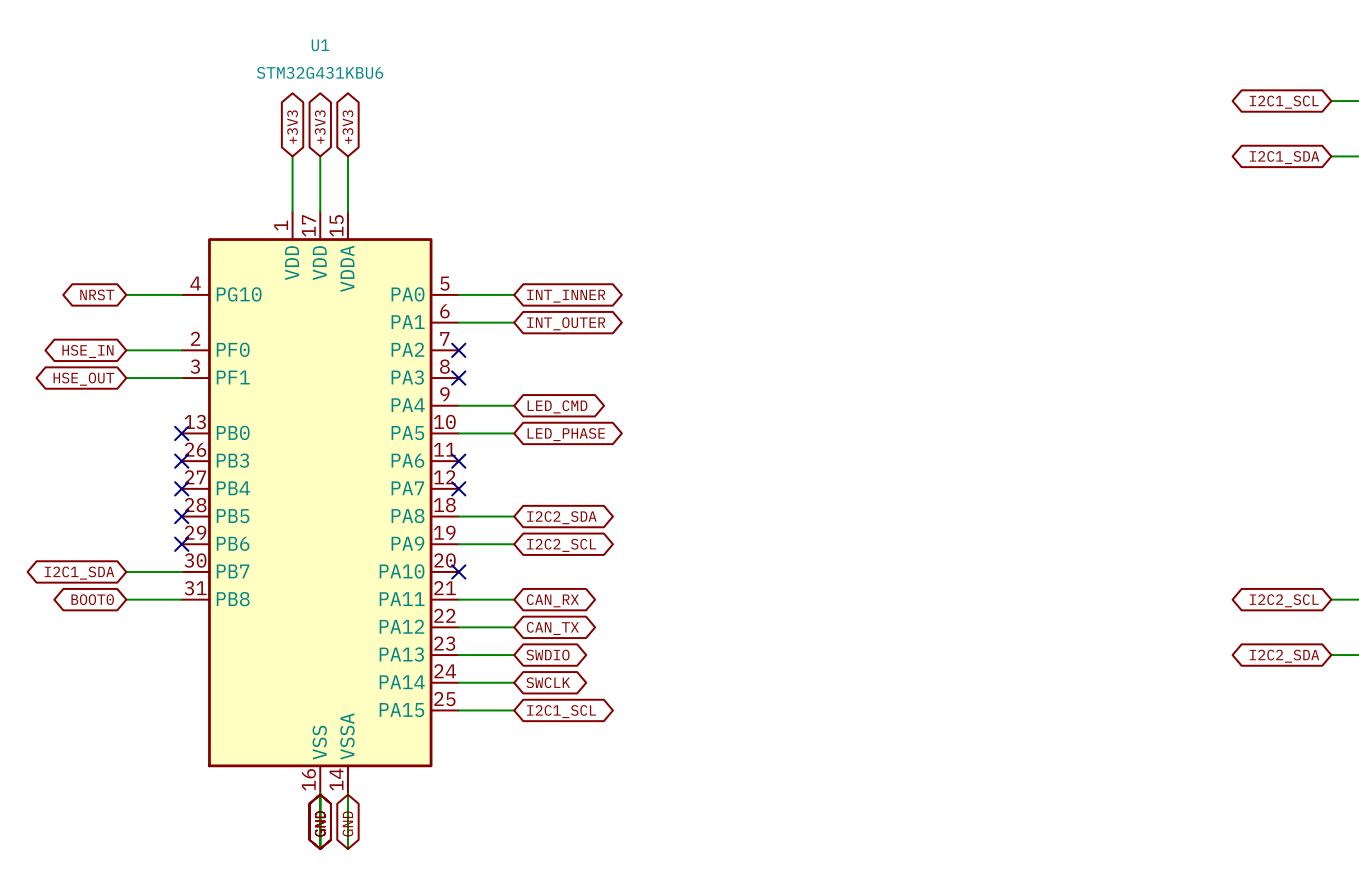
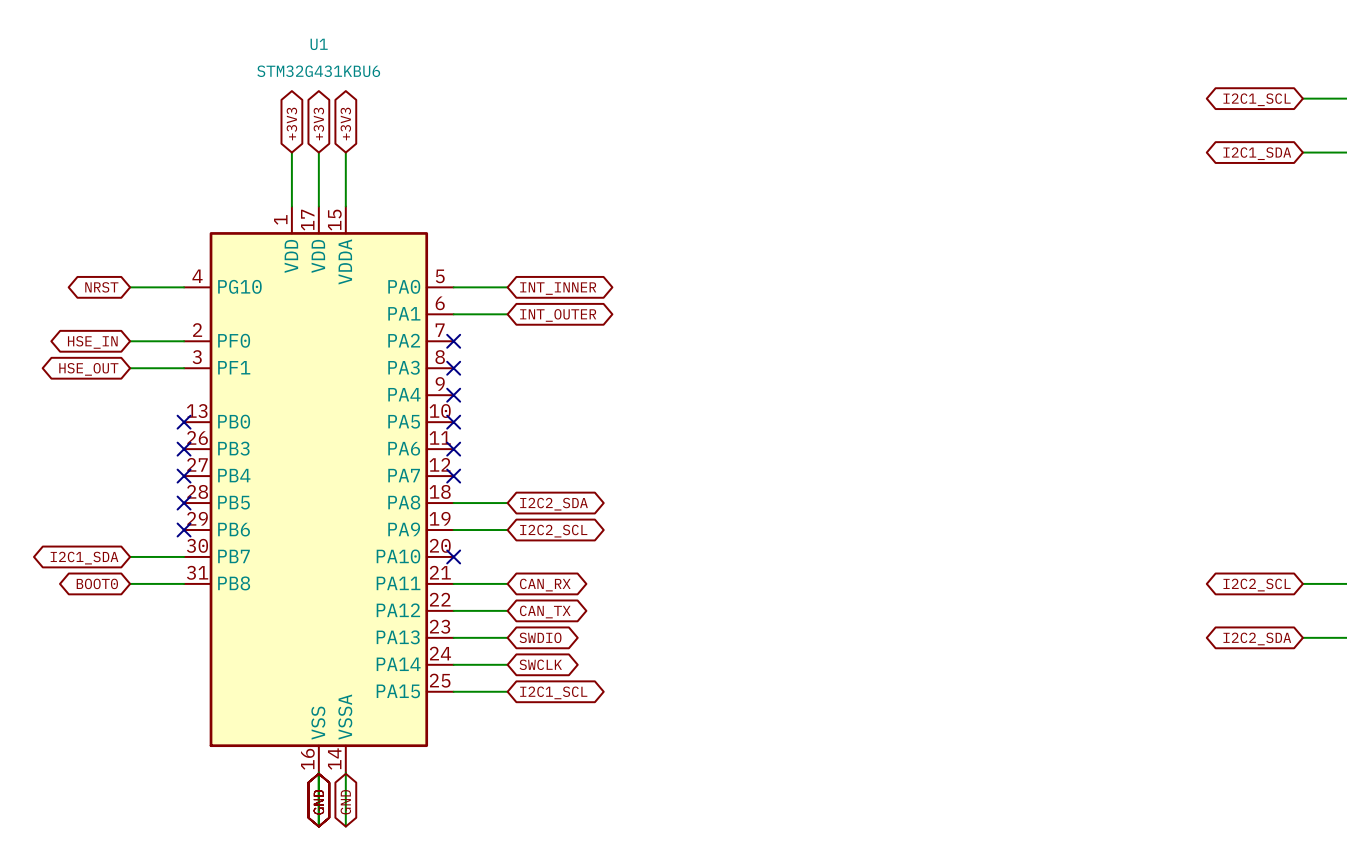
wire: (458, 405) (514, 405) -> none
no-connect mark: none -> (453, 395)
global label: LED_CMD (557, 406) -> none
wire: (458, 433) (514, 433) -> none
no-connect mark: none -> (453, 422)
global label: LED_PHASE (566, 434) -> none

